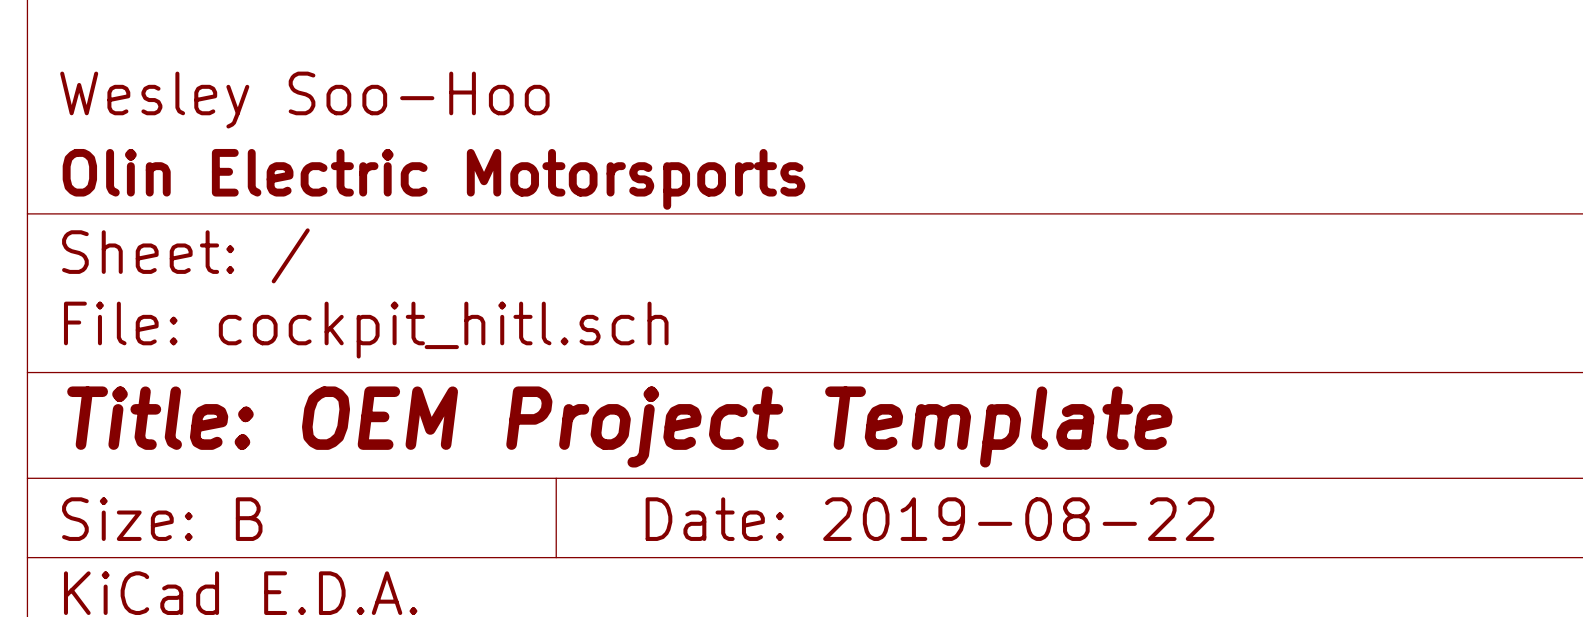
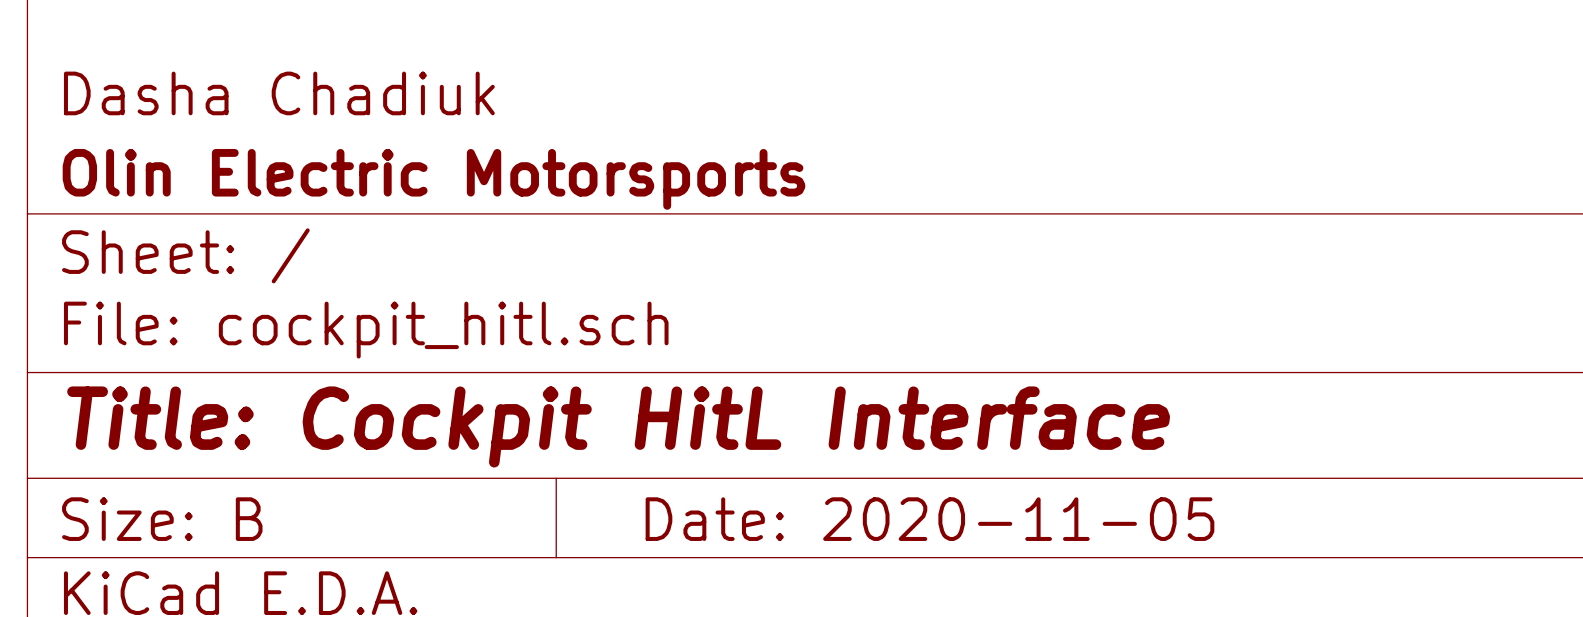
title block: Wesley Soo-Hoo (304, 100) -> Dasha Chadiuk (279, 93)
title block: Title: OEM Project Template (619, 426) -> Title: Cockpit HitL Interface (618, 426)
title block: Date: 2019-08-22 (929, 519) -> Date: 2020-11-05 (929, 519)

